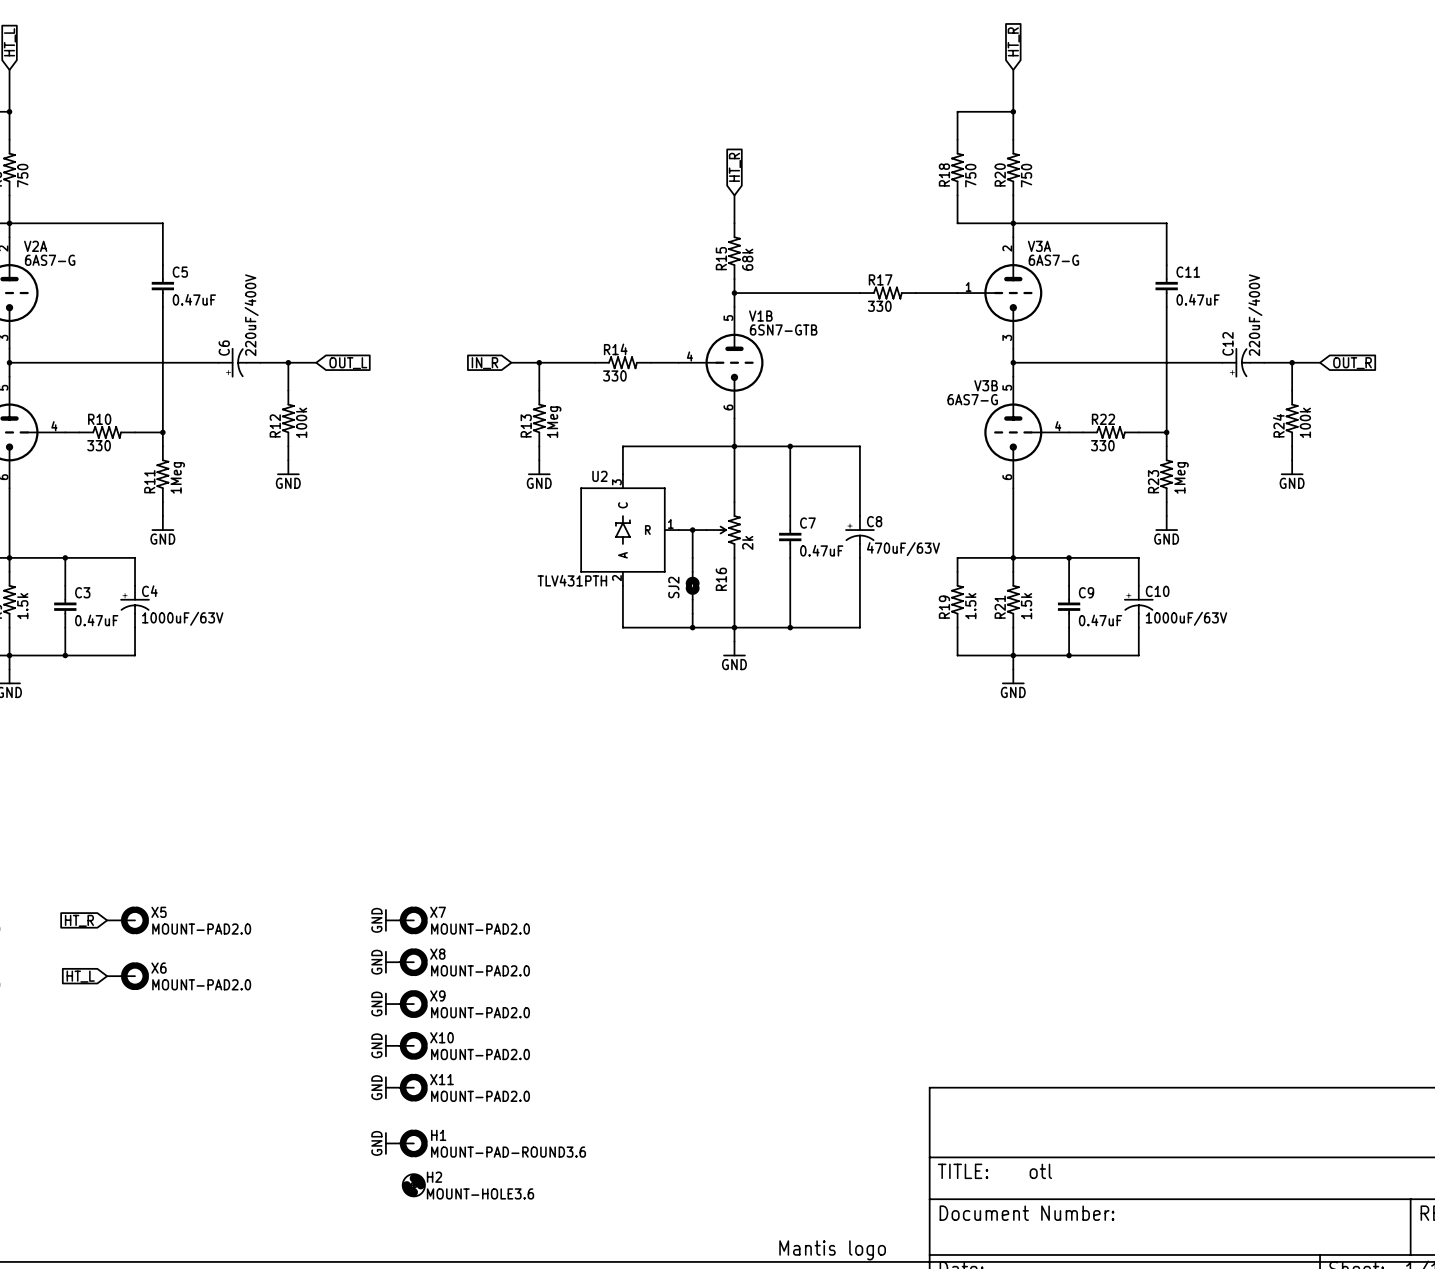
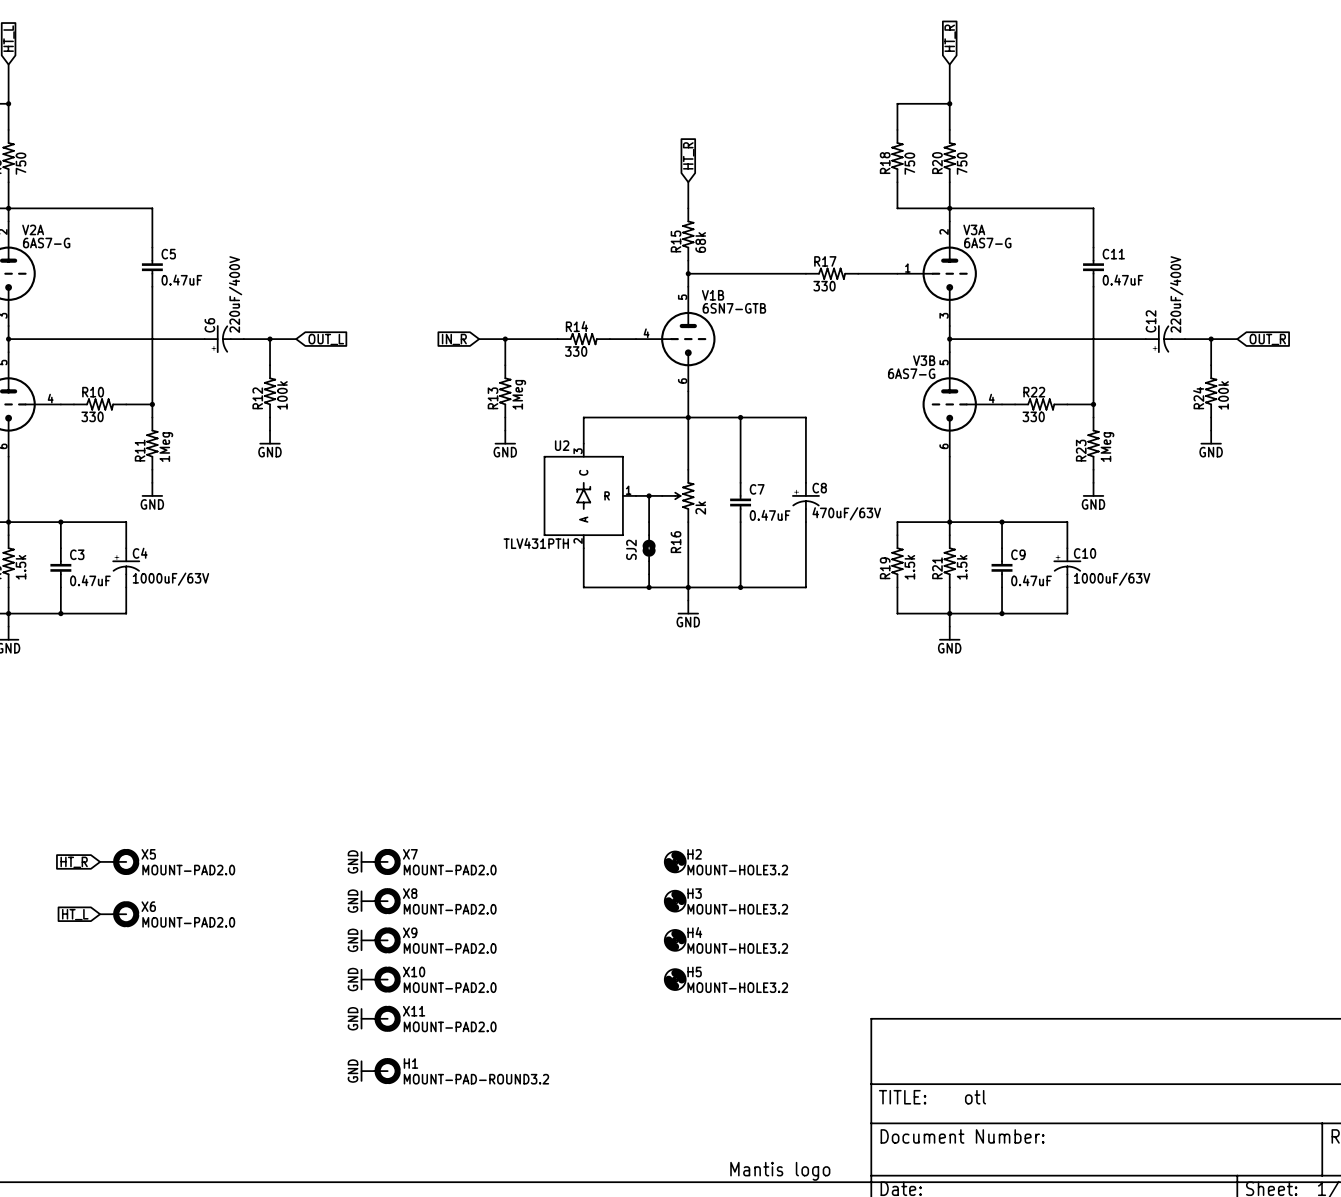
H3: none -> MOUNT-HOLE3.2 (675, 901)
H4: none -> MOUNT-HOLE3.2 (675, 940)
H5: none -> MOUNT-HOLE3.2 (675, 979)
H1 value: MOUNT-PAD-ROUND3.6 (508, 1152) -> MOUNT-PAD-ROUND3.2 (476, 1079)
H2 position: (413, 1185) -> (675, 861)
H2 value: MOUNT-HOLE3.6 (480, 1193) -> MOUNT-HOLE3.2 (737, 870)

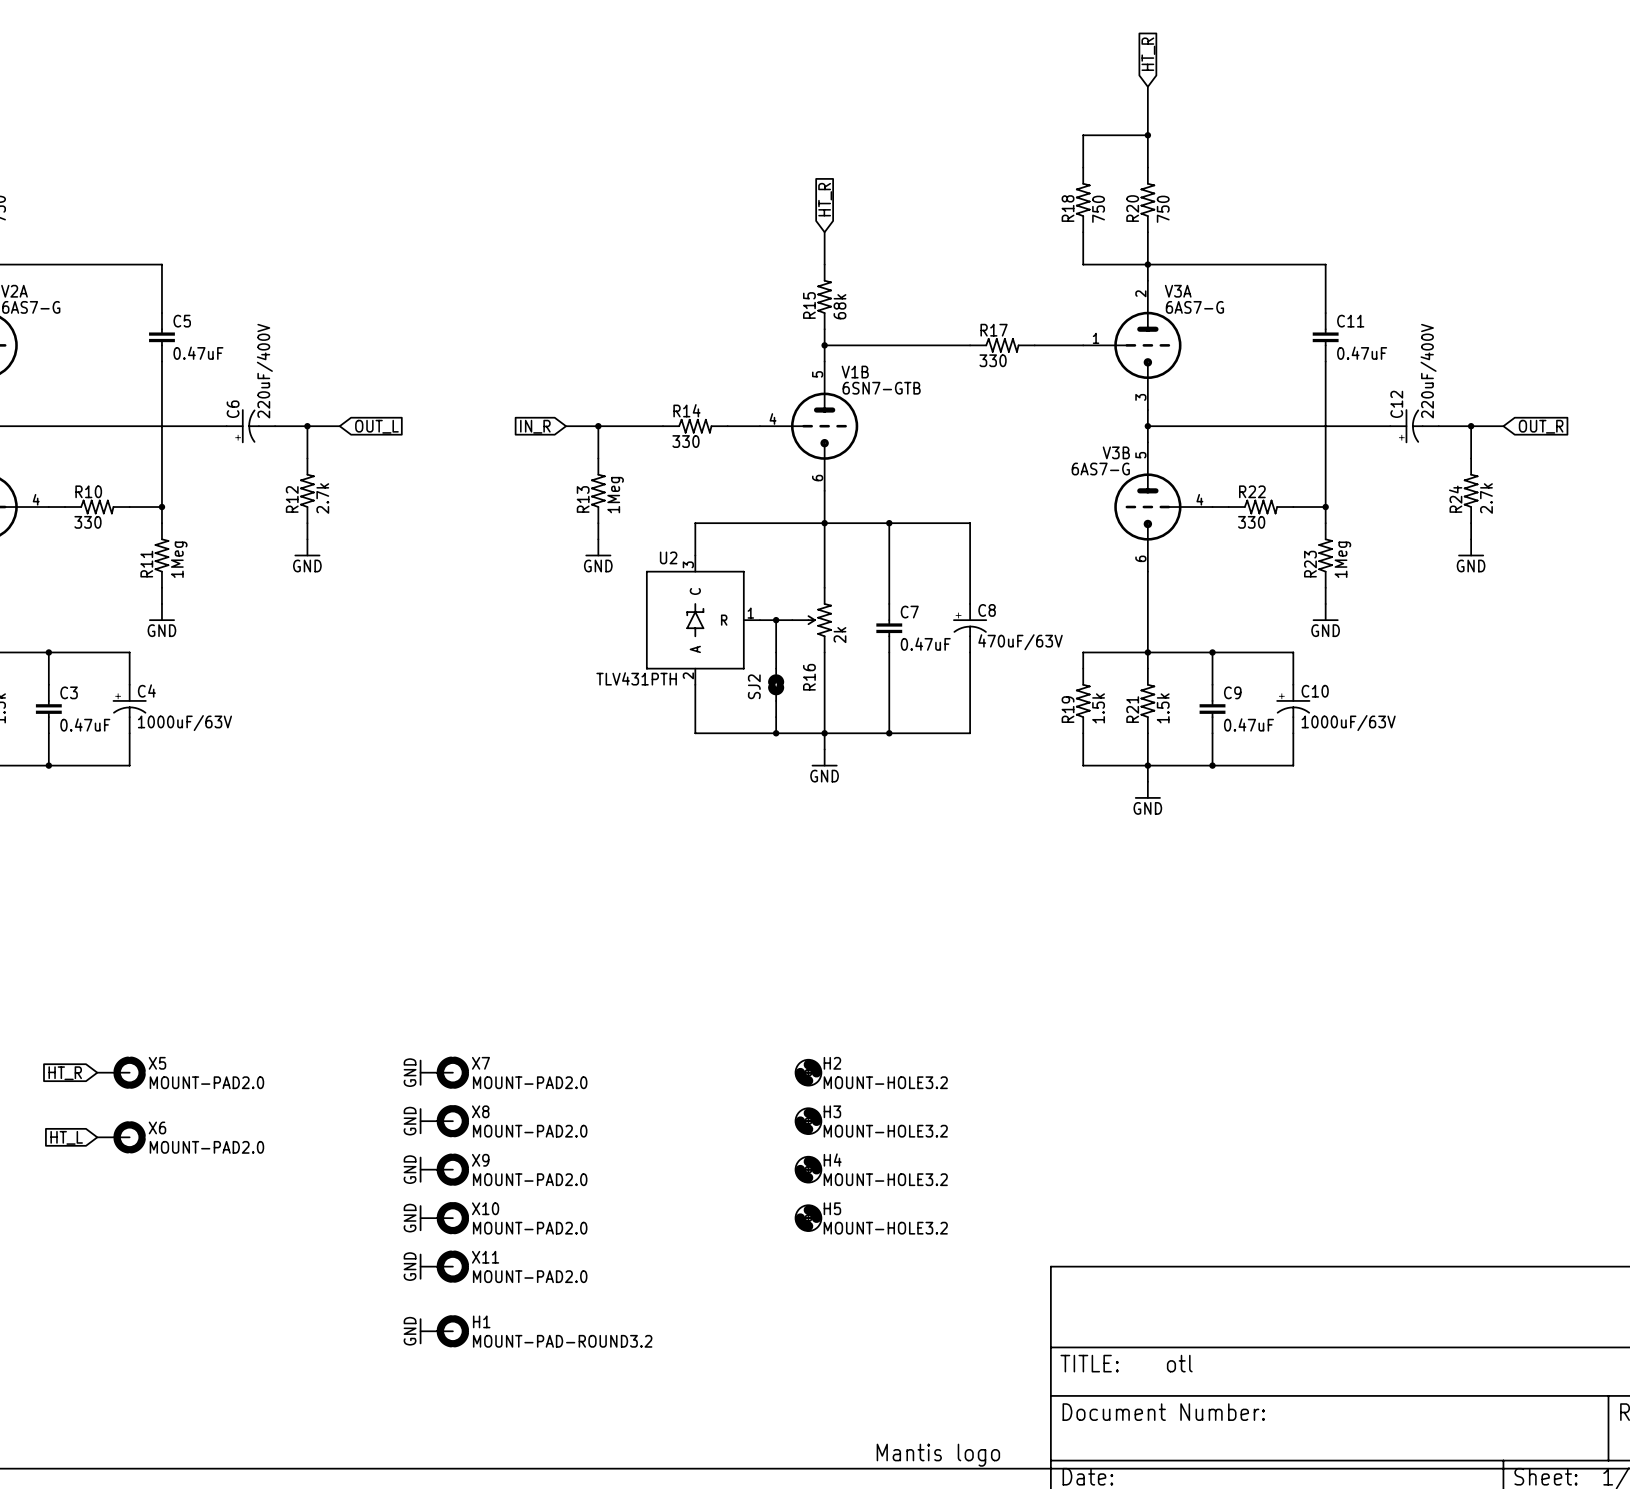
R12 value: 100k (282, 395) -> 2.7k (322, 498)
R24 value: 100k (1223, 395) -> 2.7k (1486, 498)

